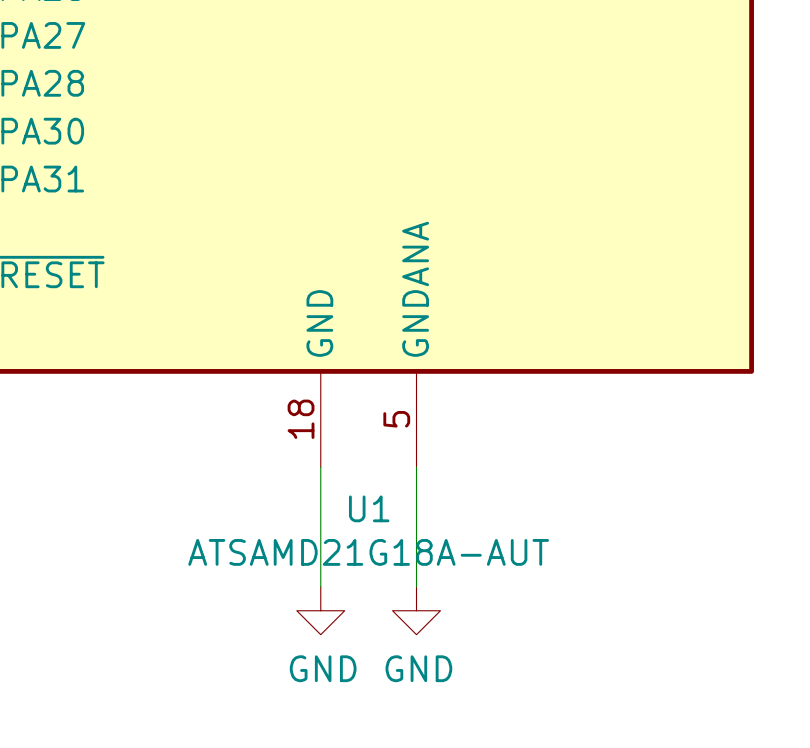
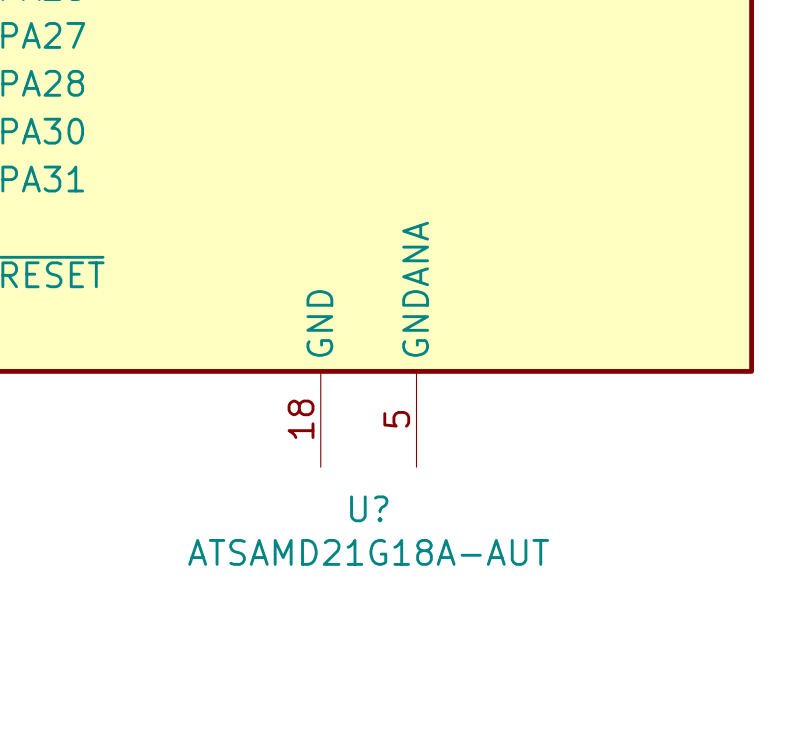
wire: (320, 467) (320, 586) -> none
wire: (416, 467) (416, 586) -> none
U1 name: U1 (369, 508) -> U? (369, 508)
power symbol: GND (320, 610) -> none
power symbol: GND (416, 610) -> none

